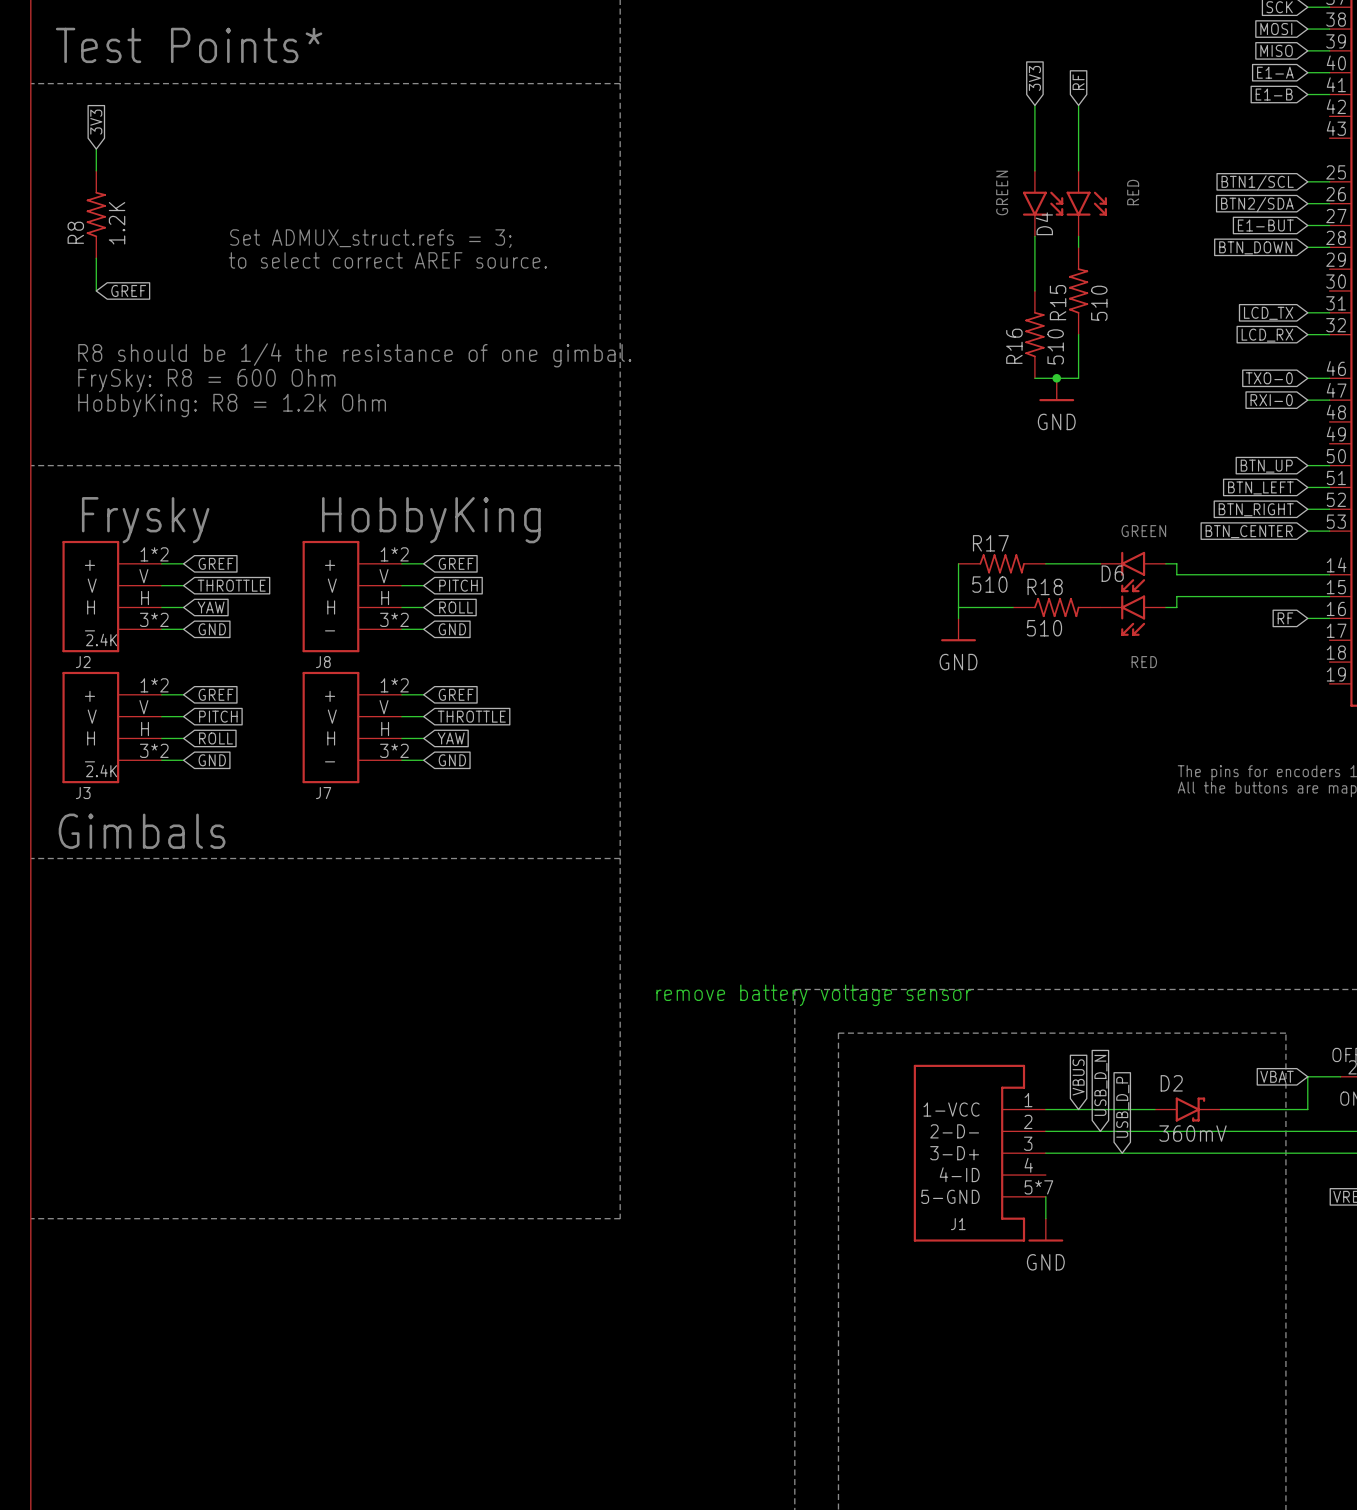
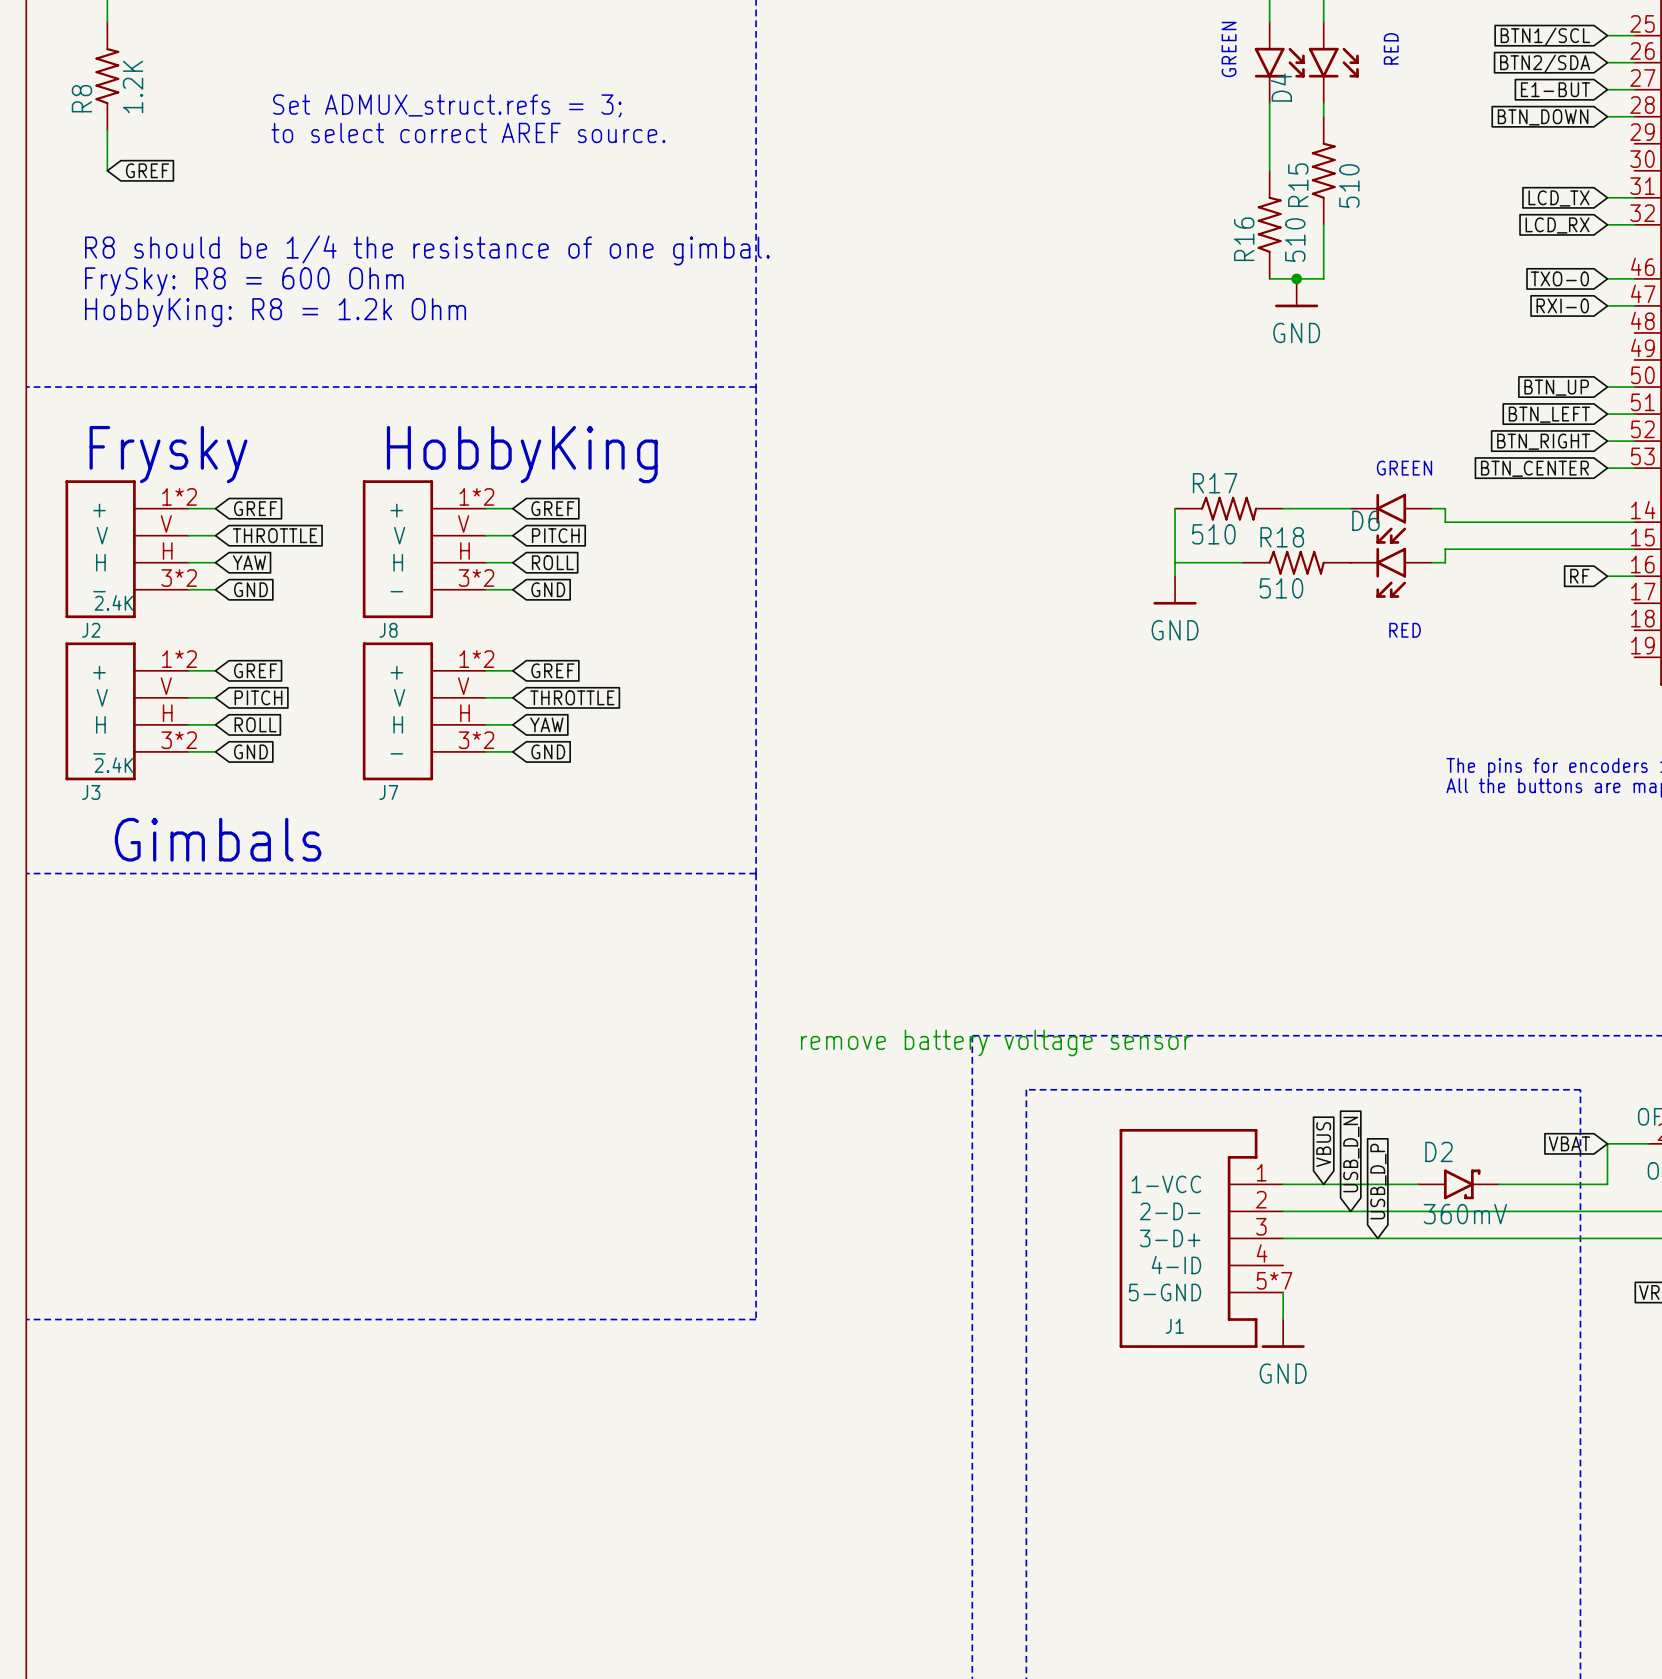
text position: Gimbals (142, 831) -> Gimbals (218, 839)

